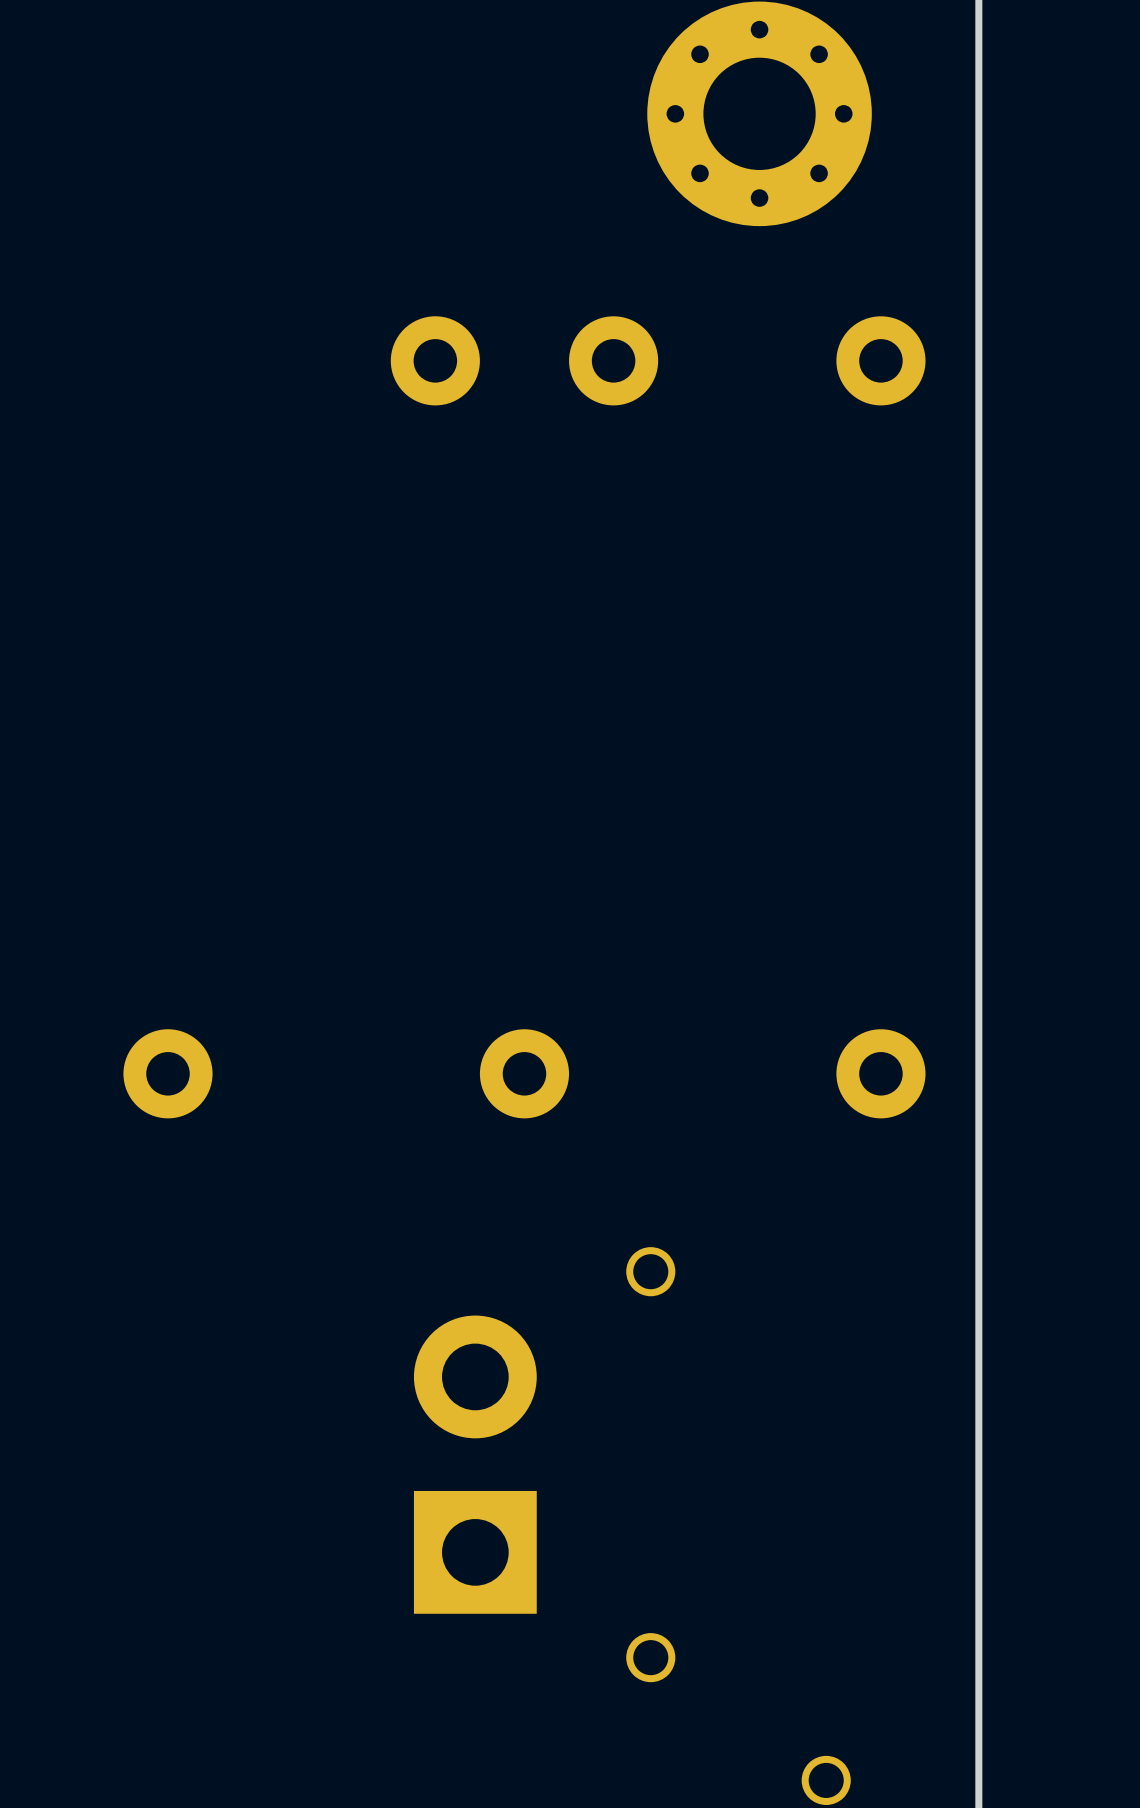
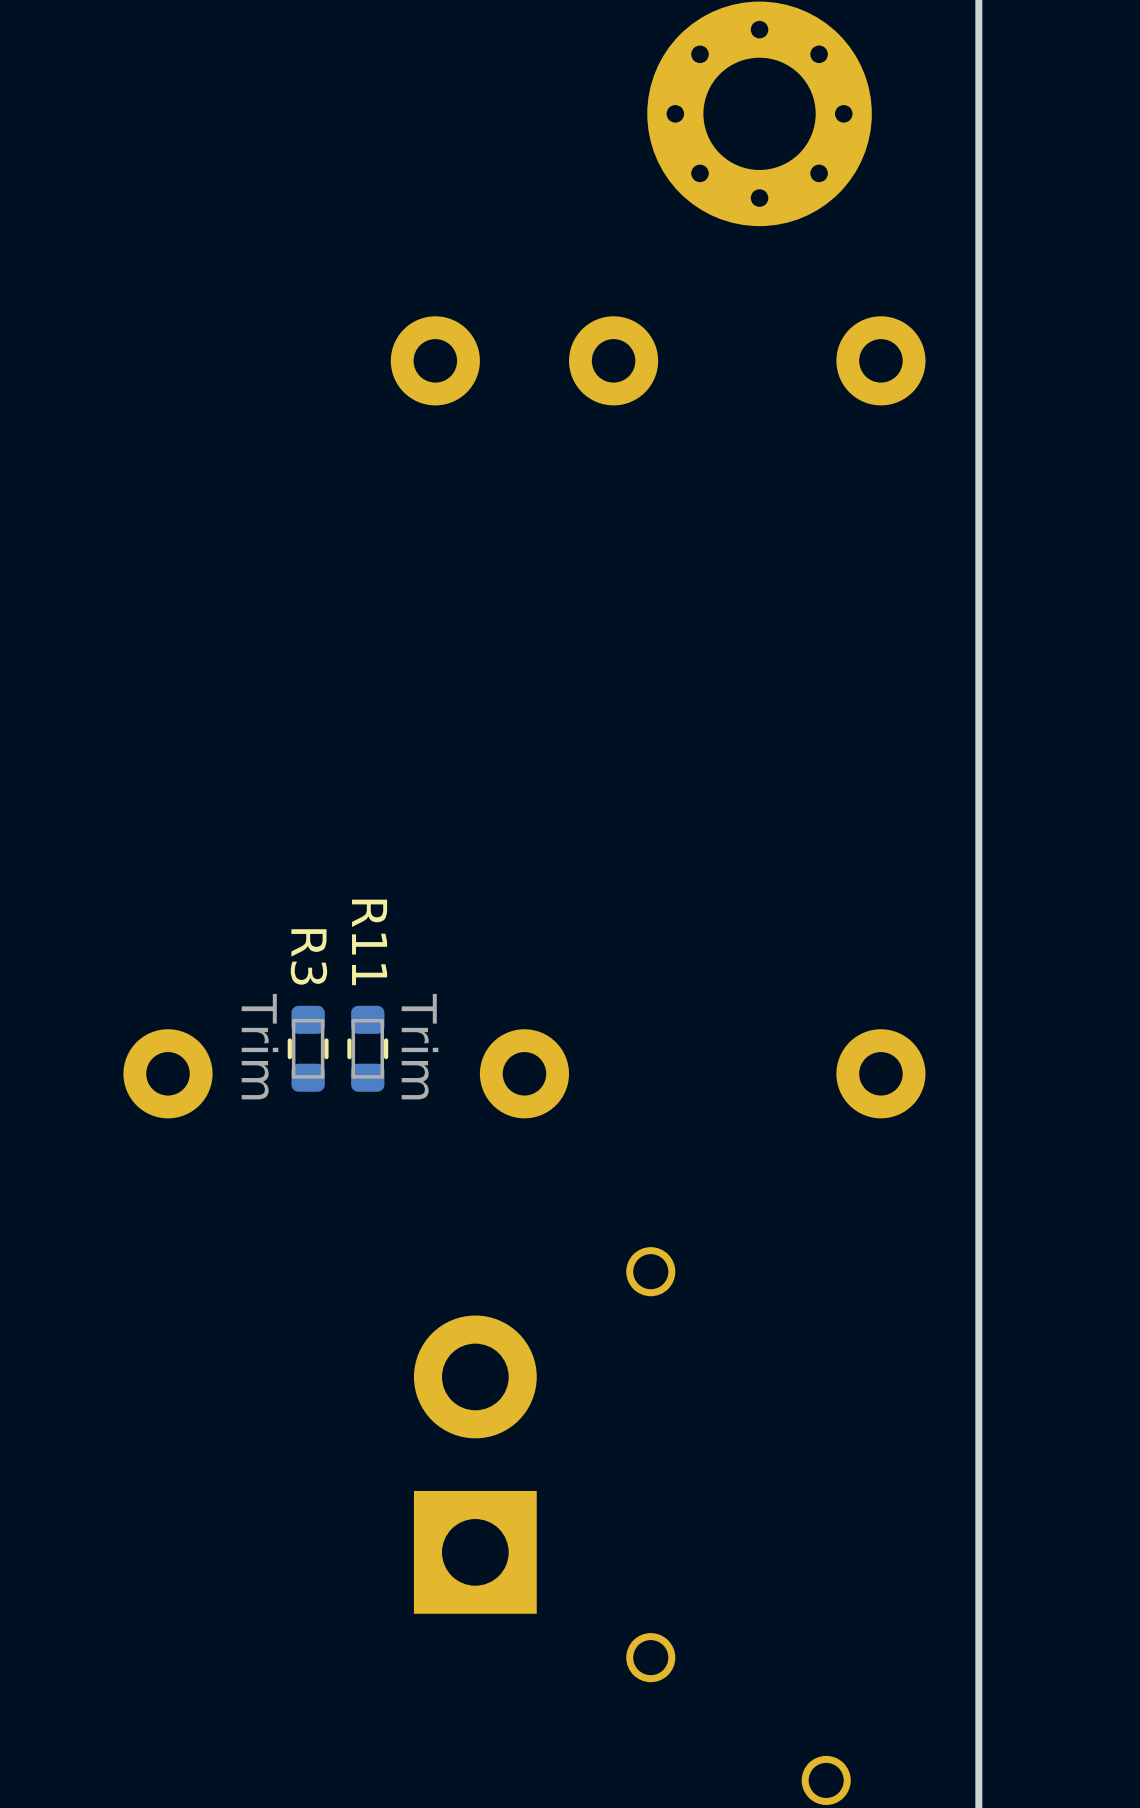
R3: none -> Trim (308, 1048)
R11: none -> Trim (367, 1048)

